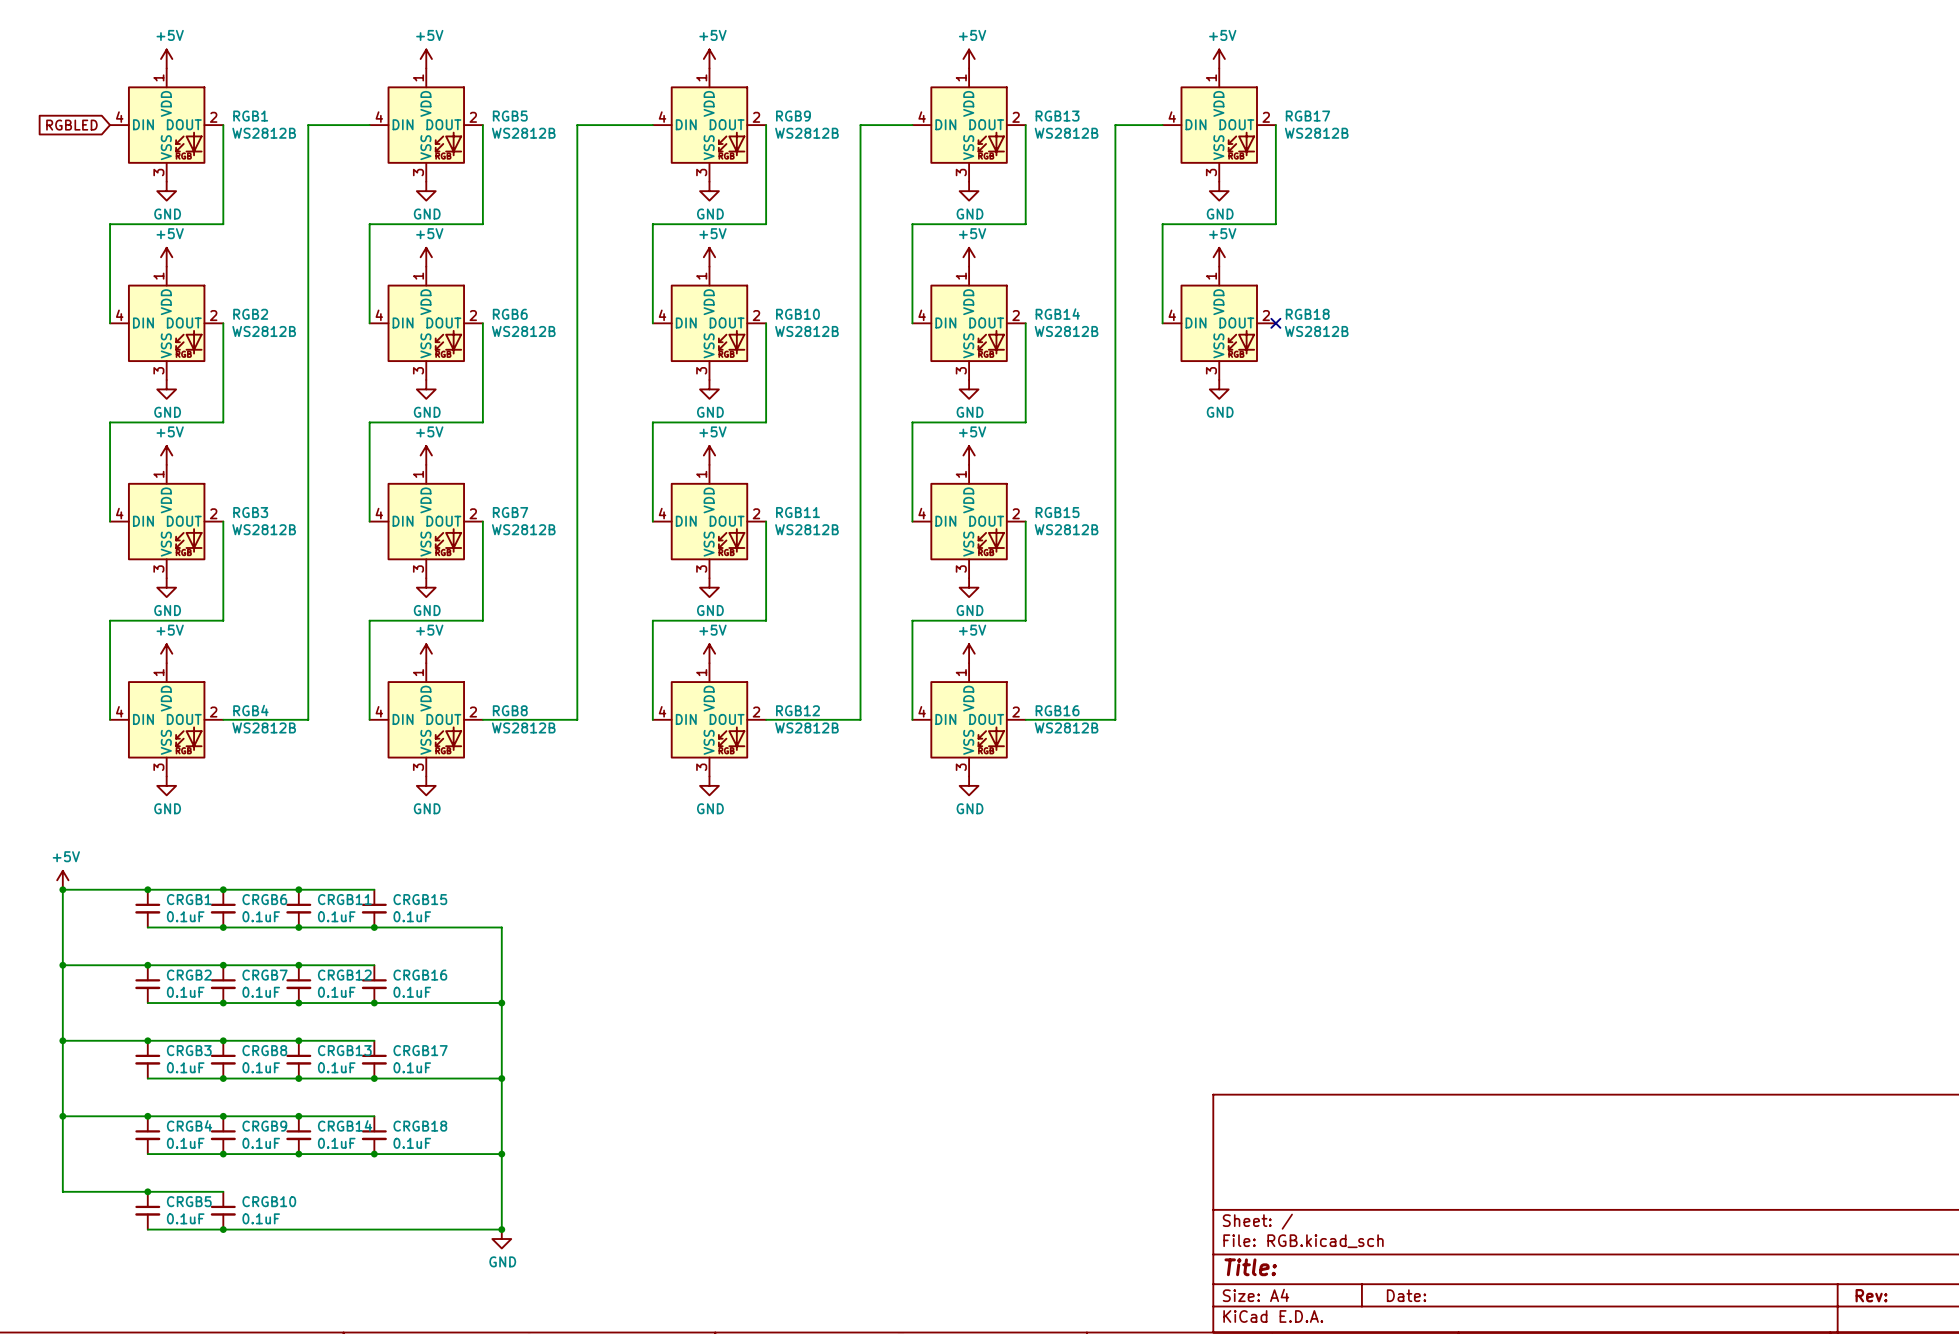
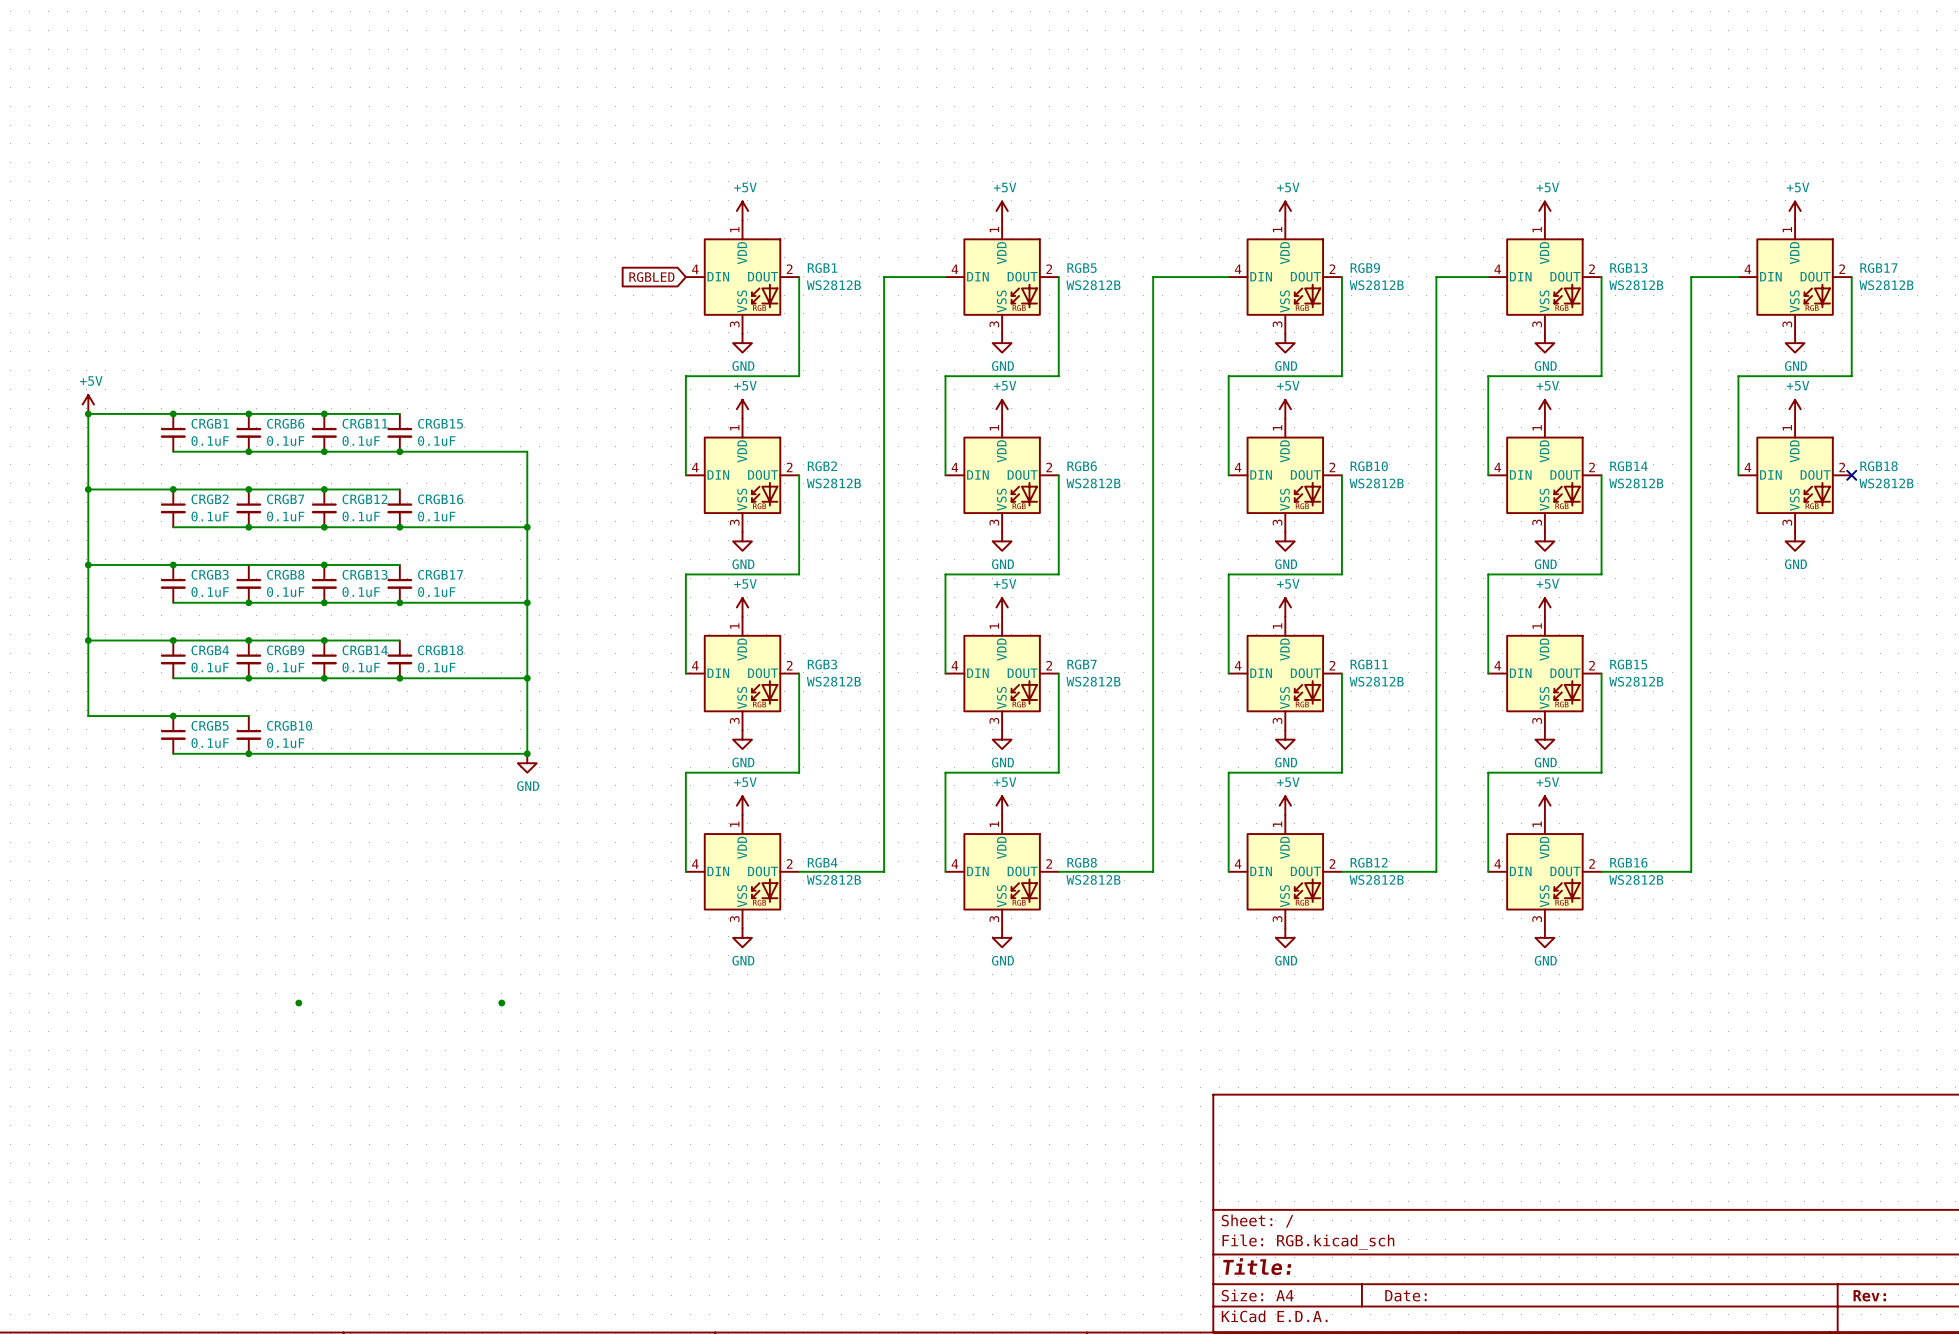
power symbol: +5V (166, 59) -> none
power symbol: +5V (426, 59) -> none
power symbol: +5V (709, 59) -> none
power symbol: +5V (969, 59) -> none
power symbol: +5V (1219, 59) -> none
global label: RGBLED (71, 125) -> none
RGB1 position: (166, 125) -> (742, 277)
wire: (223, 125) (223, 224) (110, 224) (110, 323) -> none
wire: (369, 125) (308, 125) (308, 719) (223, 719) -> none
RGB5 position: (426, 125) -> (1002, 277)
wire: (482, 125) (482, 224) (369, 224) (369, 323) -> none
wire: (652, 125) (577, 125) (577, 719) (482, 719) -> none
RGB9 position: (709, 125) -> (1285, 277)
wire: (766, 125) (766, 224) (652, 224) (652, 323) -> (799, 277) (799, 376) (685, 376) (685, 475)
wire: (912, 125) (860, 125) (860, 719) (766, 719) -> none
RGB13 position: (969, 125) -> (1544, 277)
wire: (1025, 125) (1025, 224) (912, 224) (912, 323) -> (1058, 277) (1058, 376) (945, 376) (945, 475)
wire: (1162, 125) (1115, 125) (1115, 719) (1025, 719) -> none
RGB17 position: (1219, 125) -> (1795, 277)
wire: (1275, 125) (1275, 224) (1162, 224) (1162, 323) -> (1341, 277) (1341, 376) (1228, 376) (1228, 475)
power symbol: GND (166, 191) -> none
power symbol: GND (426, 191) -> none
power symbol: GND (709, 191) -> none
power symbol: GND (969, 191) -> none
power symbol: GND (1219, 191) -> none
power symbol: none -> +5V (1544, 210)
power symbol: none -> +5V (1795, 210)
power symbol: +5V (166, 257) -> none
power symbol: +5V (426, 257) -> none
power symbol position: +5V (709, 257) -> +5V (742, 210)
power symbol position: +5V (969, 257) -> +5V (1002, 210)
power symbol position: +5V (1219, 257) -> +5V (1285, 210)
global label: none -> RGBLED (651, 277)
wire: none -> (945, 277) (884, 277) (884, 871) (799, 871)
wire: none -> (1228, 277) (1153, 277) (1153, 871) (1058, 871)
wire: none -> (1488, 277) (1436, 277) (1436, 871) (1341, 871)
wire: none -> (1601, 277) (1601, 376) (1488, 376) (1488, 475)
wire: none -> (1738, 277) (1691, 277) (1691, 871) (1601, 871)
wire: none -> (1851, 277) (1851, 376) (1738, 376) (1738, 475)
RGB2 position: (166, 323) -> (742, 475)
wire: (223, 323) (223, 422) (110, 422) (110, 521) -> none
RGB6 position: (426, 323) -> (1002, 475)
wire: (482, 323) (482, 422) (369, 422) (369, 521) -> none
RGB10 position: (709, 323) -> (1285, 475)
wire: (766, 323) (766, 422) (652, 422) (652, 521) -> (799, 475) (799, 574) (685, 574) (685, 673)
RGB14 position: (969, 323) -> (1544, 475)
wire: (1025, 323) (1025, 422) (912, 422) (912, 521) -> (1058, 475) (1058, 574) (945, 574) (945, 673)
RGB18 position: (1219, 323) -> (1795, 475)
no-connect mark: (1275, 323) -> none
power symbol: none -> GND (1544, 343)
power symbol: none -> GND (1795, 343)
power symbol: GND (166, 389) -> none
power symbol: GND (426, 389) -> none
power symbol position: GND (709, 389) -> GND (742, 343)
power symbol position: GND (969, 389) -> GND (1002, 343)
power symbol position: GND (1219, 389) -> GND (1285, 343)
power symbol: none -> +5V (88, 404)
power symbol: none -> +5V (1285, 409)
power symbol: none -> +5V (1544, 409)
power symbol: none -> +5V (1795, 409)
junction: none -> (88, 413)
junction: none -> (173, 413)
junction: none -> (248, 413)
junction: none -> (324, 413)
wire: none -> (399, 413) (88, 413) (88, 716) (248, 716)
wire: none -> (173, 451) (527, 451) (527, 753) (173, 753)
junction: none -> (248, 451)
junction: none -> (324, 451)
junction: none -> (399, 451)
power symbol: +5V (166, 455) -> none
power symbol: +5V (426, 455) -> none
power symbol position: +5V (709, 455) -> +5V (742, 409)
power symbol position: +5V (969, 455) -> +5V (1002, 409)
wire: none -> (1341, 475) (1341, 574) (1228, 574) (1228, 673)
wire: none -> (1601, 475) (1601, 574) (1488, 574) (1488, 673)
no-connect mark: none -> (1851, 475)
wire: none -> (88, 489) (399, 489)
junction: none -> (88, 489)
junction: none -> (173, 489)
junction: none -> (248, 489)
junction: none -> (324, 489)
RGB3 position: (166, 521) -> (742, 673)
wire: (223, 521) (223, 620) (110, 620) (110, 719) -> none
RGB7 position: (426, 521) -> (1002, 673)
wire: (482, 521) (482, 620) (369, 620) (369, 719) -> none
RGB11 position: (709, 521) -> (1285, 673)
wire: (766, 521) (766, 620) (652, 620) (652, 719) -> (799, 673) (799, 772) (685, 772) (685, 871)
RGB15 position: (969, 521) -> (1544, 673)
wire: (1025, 521) (1025, 620) (912, 620) (912, 719) -> (1058, 673) (1058, 772) (945, 772) (945, 871)
wire: none -> (173, 527) (527, 527)
junction: none -> (248, 527)
junction: none -> (324, 527)
junction: none -> (399, 527)
junction: none -> (527, 527)
power symbol: none -> GND (1285, 541)
power symbol: none -> GND (1544, 541)
power symbol: none -> GND (1795, 541)
wire: none -> (88, 564) (399, 564)
junction: none -> (88, 564)
junction: none -> (173, 564)
junction: none -> (324, 564)
power symbol: GND (166, 587) -> none
power symbol: GND (426, 587) -> none
power symbol position: GND (709, 587) -> GND (742, 541)
power symbol position: GND (969, 587) -> GND (1002, 541)
wire: none -> (173, 602) (527, 602)
junction: none -> (248, 602)
junction: none -> (324, 602)
junction: none -> (399, 602)
junction: none -> (527, 602)
power symbol: none -> +5V (1285, 607)
power symbol: none -> +5V (1544, 607)
wire: none -> (88, 640) (399, 640)
junction: none -> (88, 640)
junction: none -> (173, 640)
junction: none -> (248, 640)
junction: none -> (324, 640)
power symbol: +5V (166, 653) -> none
power symbol: +5V (426, 653) -> none
power symbol position: +5V (709, 653) -> +5V (742, 607)
power symbol position: +5V (969, 653) -> +5V (1002, 607)
wire: none -> (1341, 673) (1341, 772) (1228, 772) (1228, 871)
wire: none -> (1601, 673) (1601, 772) (1488, 772) (1488, 871)
wire: none -> (173, 678) (527, 678)
junction: none -> (248, 678)
junction: none -> (324, 678)
junction: none -> (399, 678)
junction: none -> (527, 678)
junction: none -> (173, 716)
RGB4 position: (166, 719) -> (742, 871)
RGB8 position: (426, 719) -> (1002, 871)
RGB12 position: (709, 719) -> (1285, 871)
RGB16 position: (969, 719) -> (1544, 871)
power symbol: none -> GND (1285, 739)
power symbol: none -> GND (1544, 739)
junction: none -> (248, 753)
junction: none -> (527, 753)
power symbol: none -> GND (527, 763)
power symbol: GND (166, 785) -> none
power symbol: GND (426, 785) -> none
power symbol position: GND (709, 785) -> GND (742, 739)
power symbol position: GND (969, 785) -> GND (1002, 739)
power symbol: none -> +5V (742, 805)
power symbol: none -> +5V (1002, 805)
power symbol: none -> +5V (1285, 805)
power symbol: none -> +5V (1544, 805)
power symbol: +5V (62, 880) -> none
junction: (62, 889) -> none
junction: (147, 889) -> none
junction: (223, 889) -> none
junction: (298, 889) -> none
wire: (374, 889) (62, 889) (62, 1191) (223, 1191) -> none
CRGB1 position: (147, 908) -> (173, 432)
CRGB6 position: (223, 908) -> (248, 432)
CRGB11 position: (298, 908) -> (324, 432)
CRGB15 position: (374, 908) -> (399, 432)
wire: (147, 927) (501, 927) (501, 1229) (147, 1229) -> none
junction: (223, 927) -> none
junction: (298, 927) -> none
junction: (374, 927) -> none
power symbol: none -> GND (742, 937)
power symbol: none -> GND (1002, 937)
power symbol: none -> GND (1285, 937)
power symbol: none -> GND (1544, 937)
wire: (62, 965) (374, 965) -> none
junction: (62, 965) -> none
junction: (147, 965) -> none
junction: (223, 965) -> none
junction: (298, 965) -> none
CRGB2 position: (147, 984) -> (173, 508)
CRGB7 position: (223, 984) -> (248, 508)
CRGB12 position: (298, 984) -> (324, 508)
CRGB16 position: (374, 984) -> (399, 508)
wire: (147, 1003) (501, 1003) -> none
junction: (223, 1003) -> none
junction: (374, 1003) -> none
wire: (62, 1040) (374, 1040) -> none
junction: (62, 1040) -> none
junction: (147, 1040) -> none
junction: (223, 1040) -> none
junction: (298, 1040) -> none
CRGB3 position: (147, 1059) -> (173, 583)
CRGB8 position: (223, 1059) -> (248, 583)
CRGB13 position: (298, 1059) -> (324, 583)
CRGB17 position: (374, 1059) -> (399, 583)
wire: (147, 1078) (501, 1078) -> none
junction: (223, 1078) -> none
junction: (298, 1078) -> none
junction: (374, 1078) -> none
junction: (501, 1078) -> none
wire: (62, 1116) (374, 1116) -> none
junction: (62, 1116) -> none
junction: (147, 1116) -> none
junction: (223, 1116) -> none
junction: (298, 1116) -> none
CRGB4 position: (147, 1135) -> (173, 659)
CRGB9 position: (223, 1135) -> (248, 659)
CRGB14 position: (298, 1135) -> (324, 659)
CRGB18 position: (374, 1135) -> (399, 659)
wire: (147, 1154) (501, 1154) -> none
junction: (223, 1154) -> none
junction: (298, 1154) -> none
junction: (374, 1154) -> none
junction: (501, 1154) -> none
junction: (147, 1191) -> none
CRGB5 position: (147, 1210) -> (173, 734)
CRGB10 position: (223, 1210) -> (248, 734)
junction: (223, 1229) -> none
junction: (501, 1229) -> none
power symbol: GND (501, 1239) -> none

